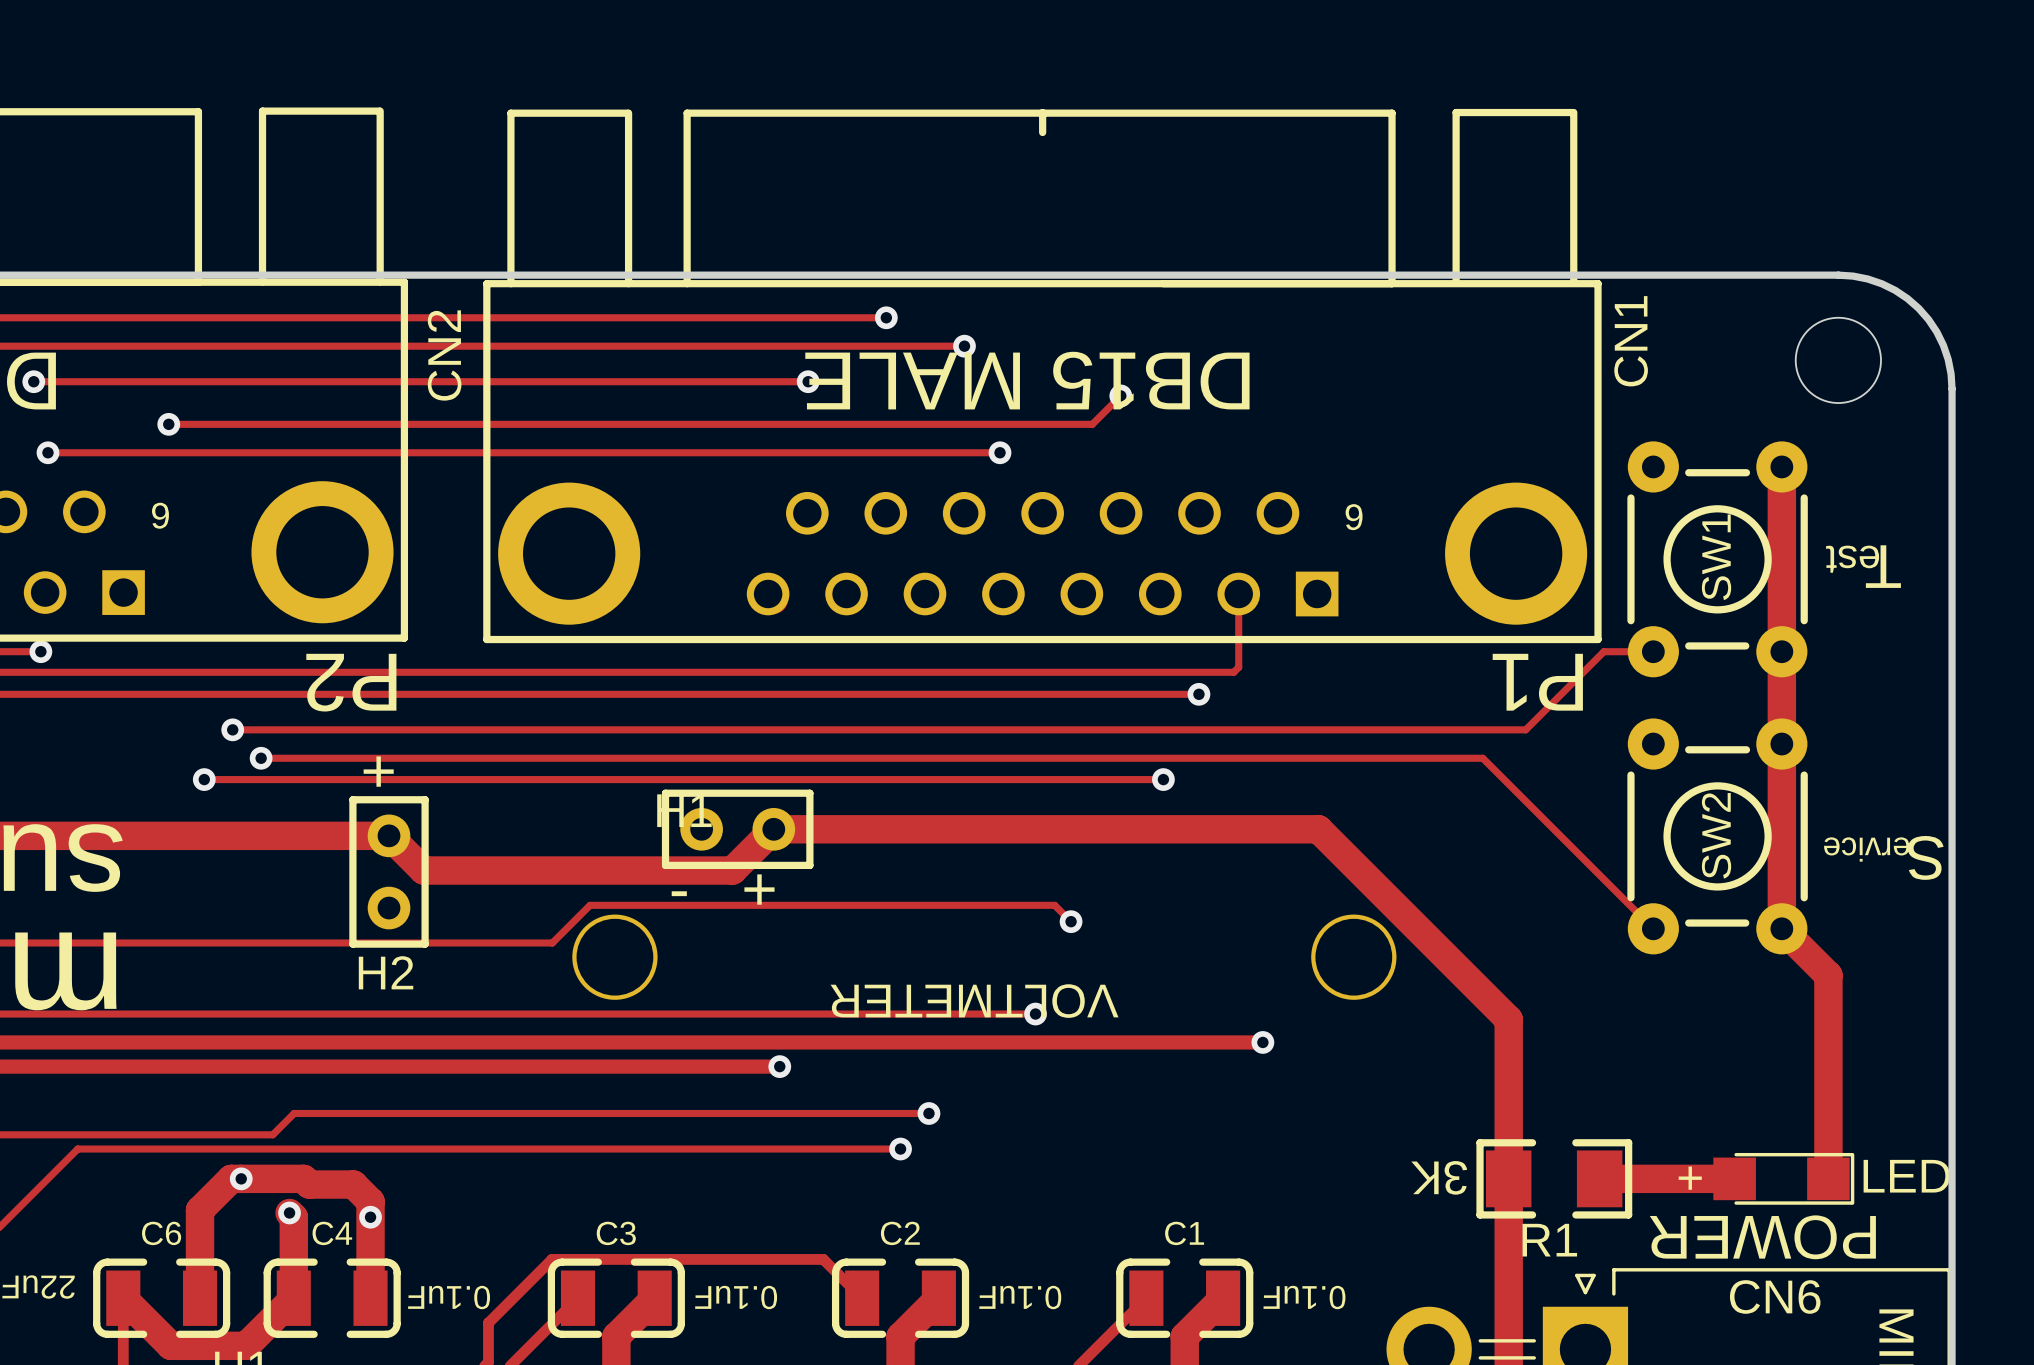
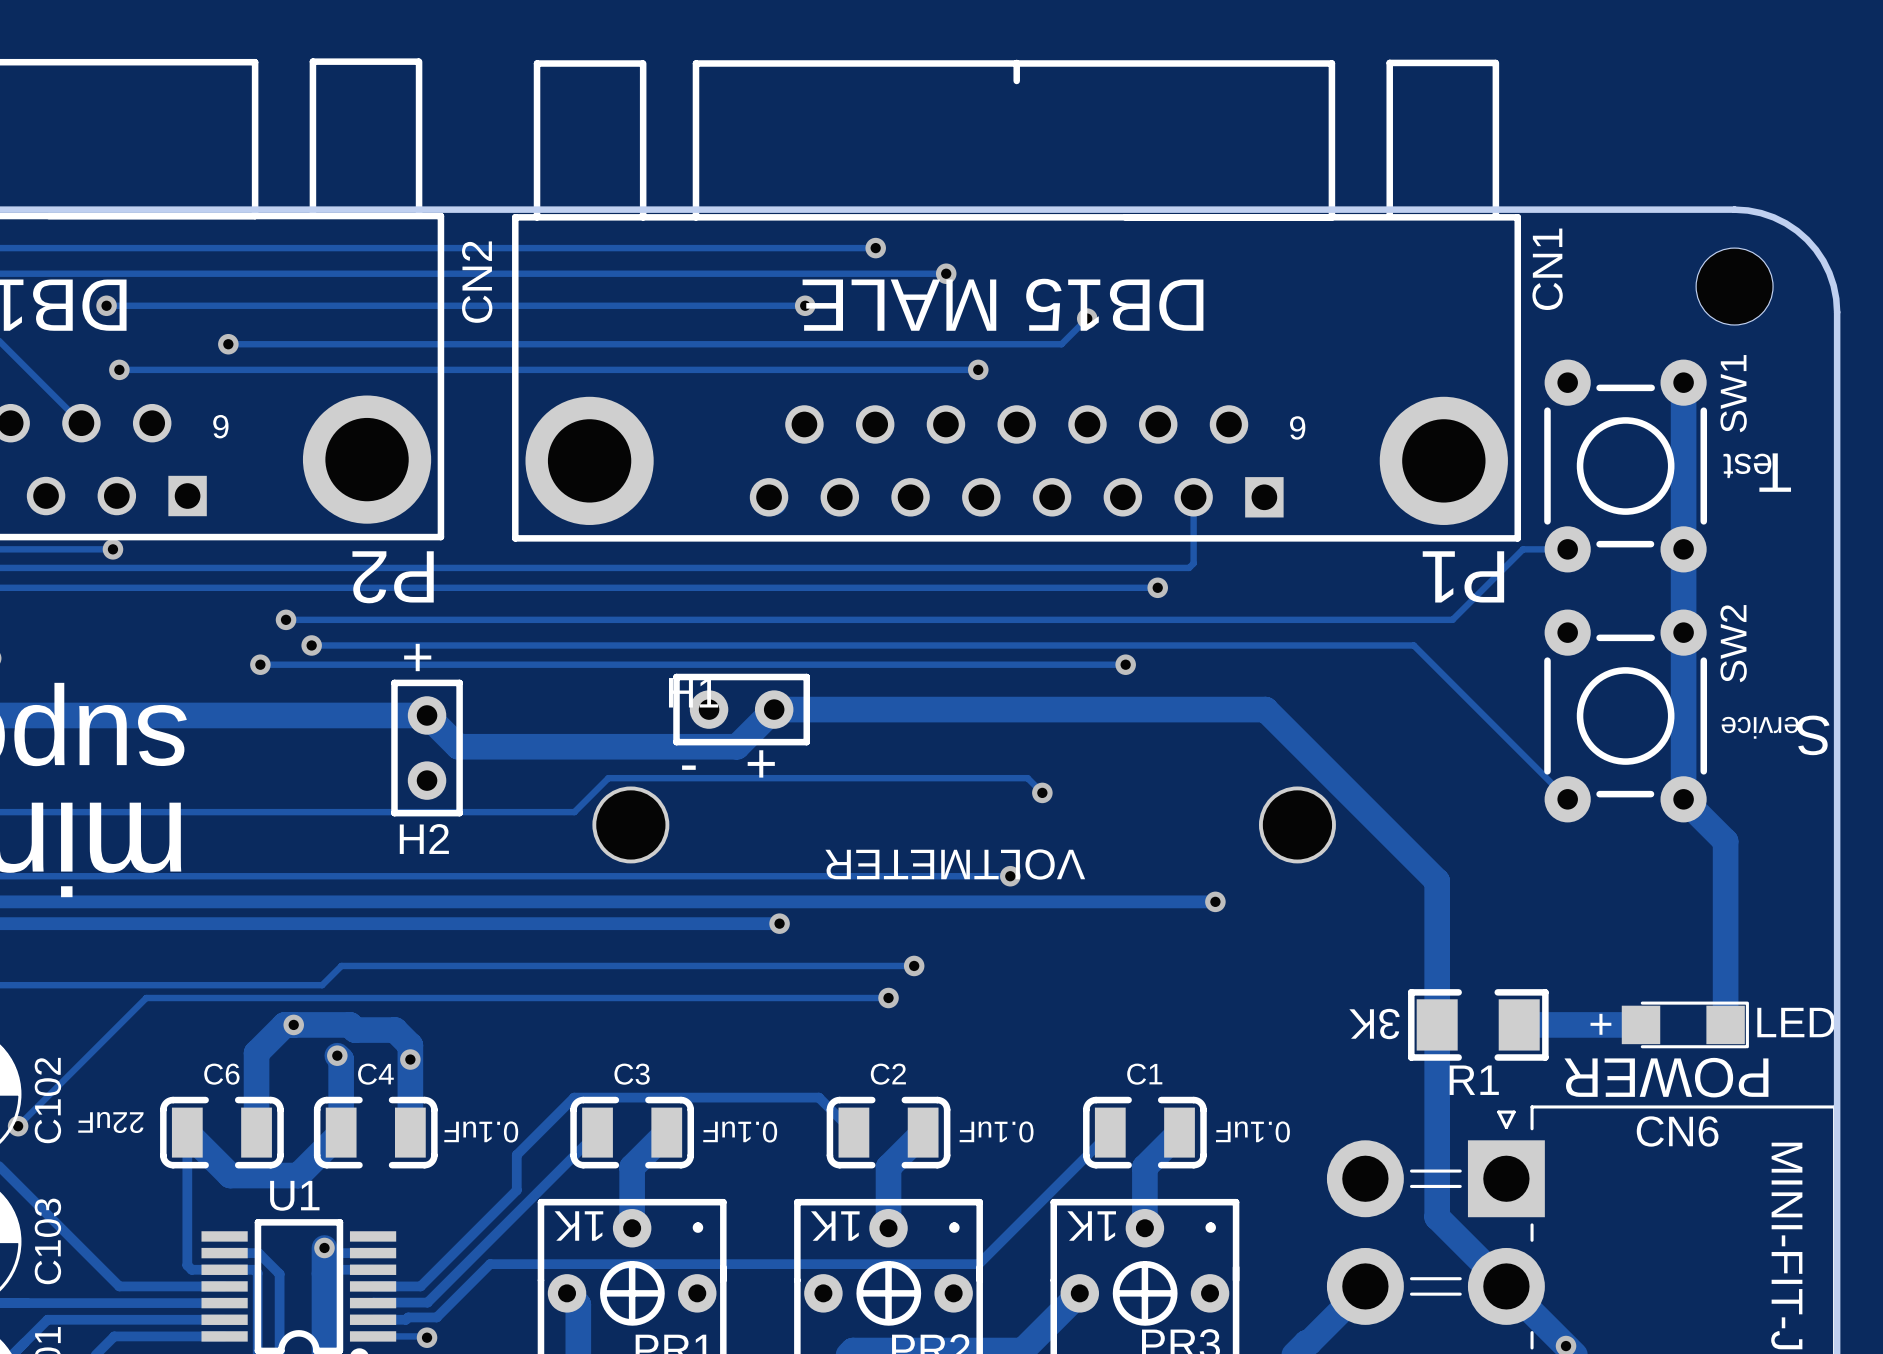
SW1 name position: SW1 (1716, 557) -> SW1 (1733, 393)
SW2 name position: SW2 (1716, 835) -> SW2 (1733, 643)

